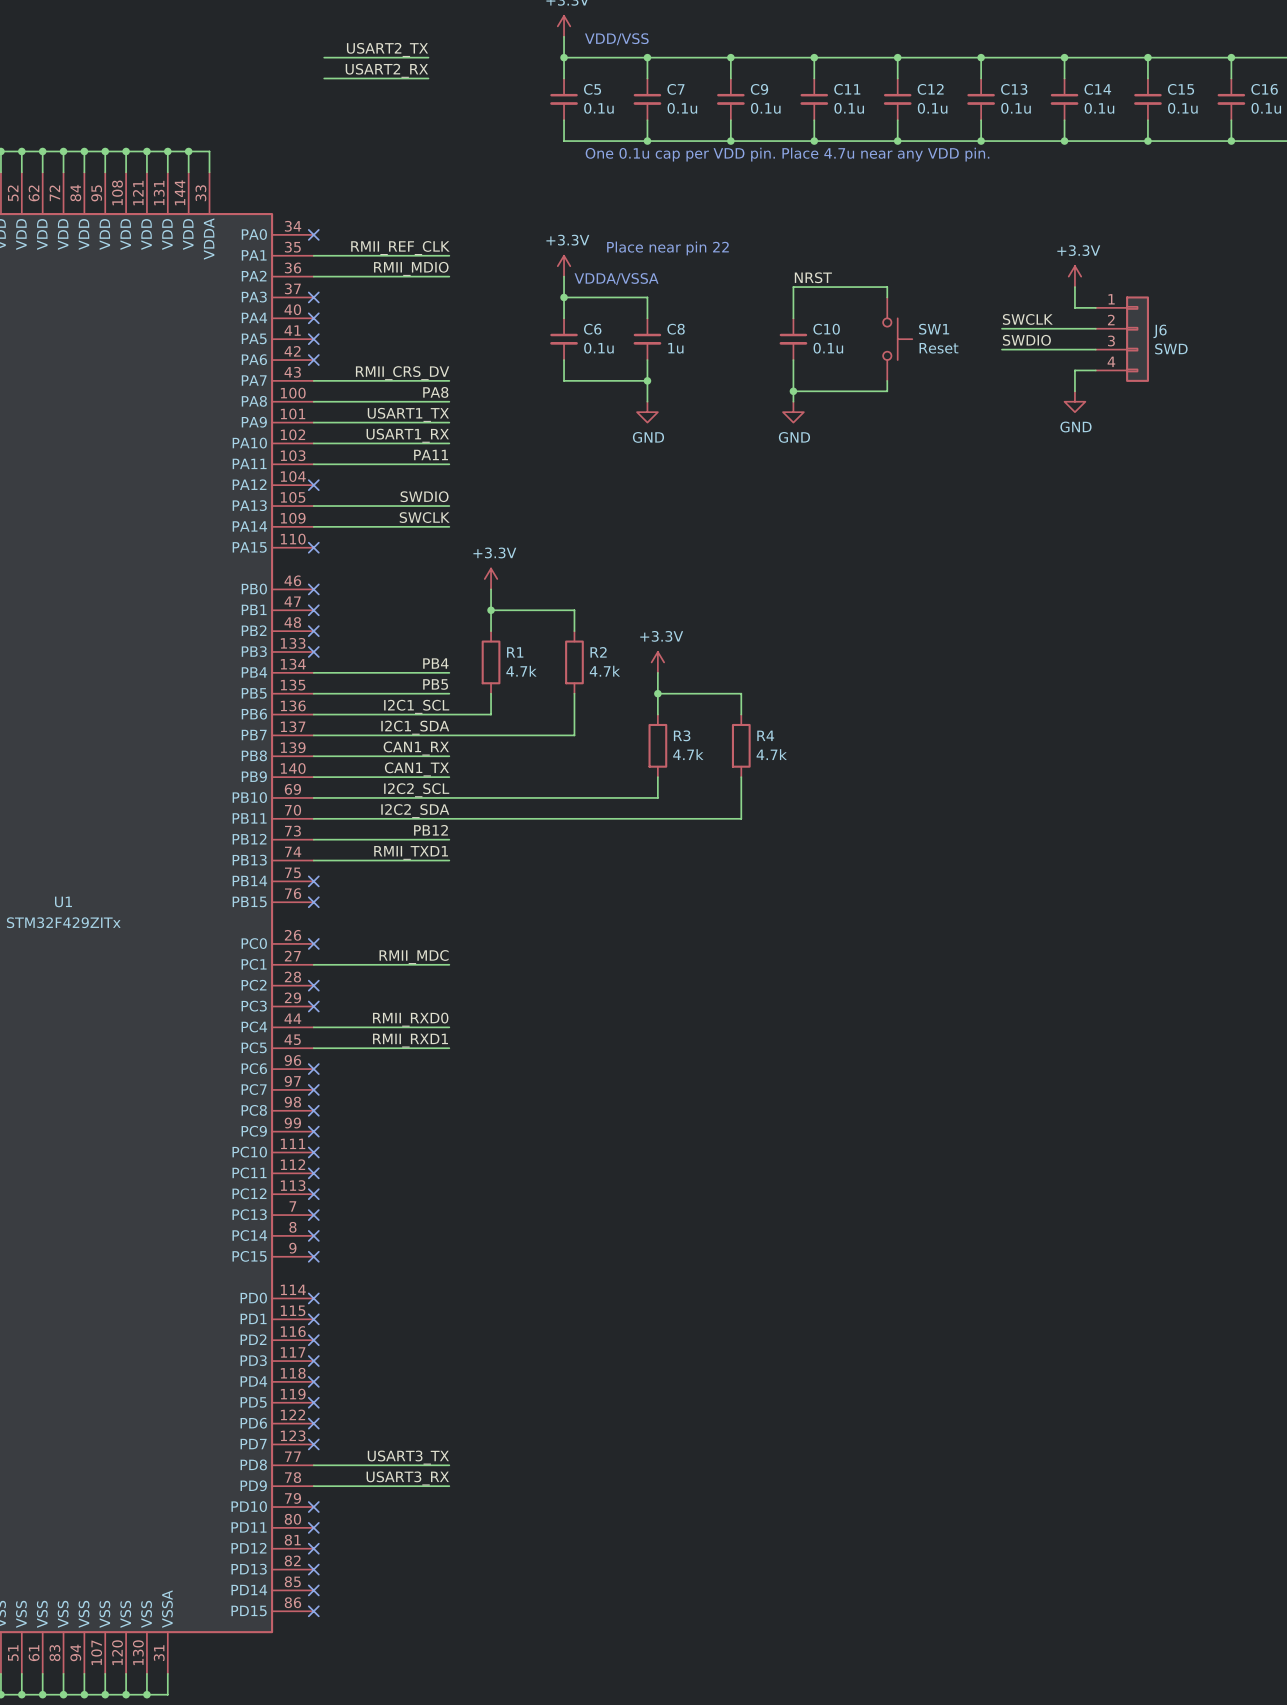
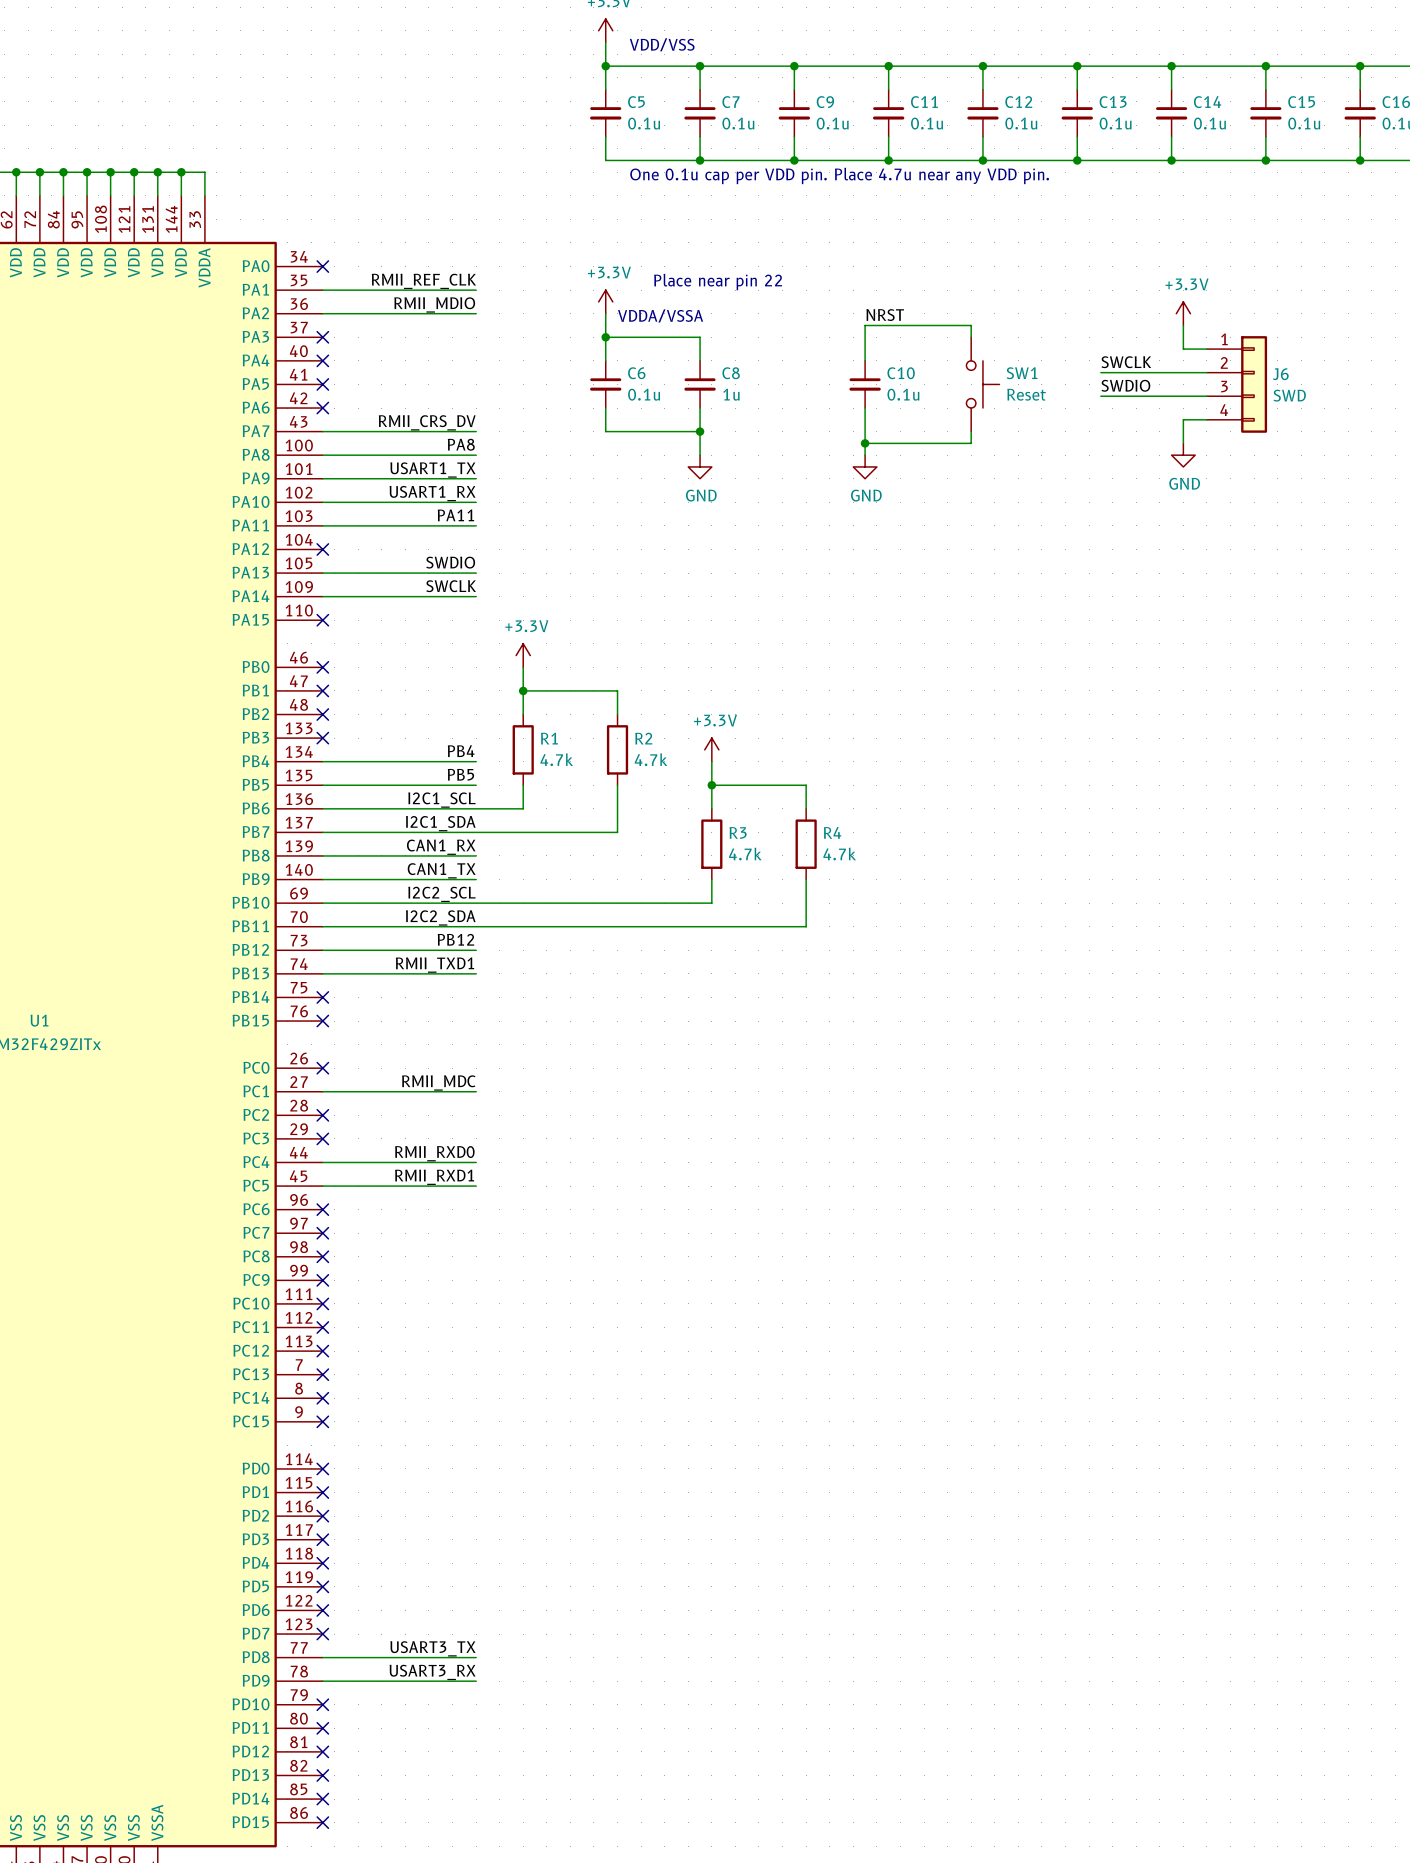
label: USART2_TX (387, 49) -> none
wire: (324, 57) (428, 57) -> none
label: USART2_RX (386, 70) -> none
wire: (324, 78) (428, 78) -> none

